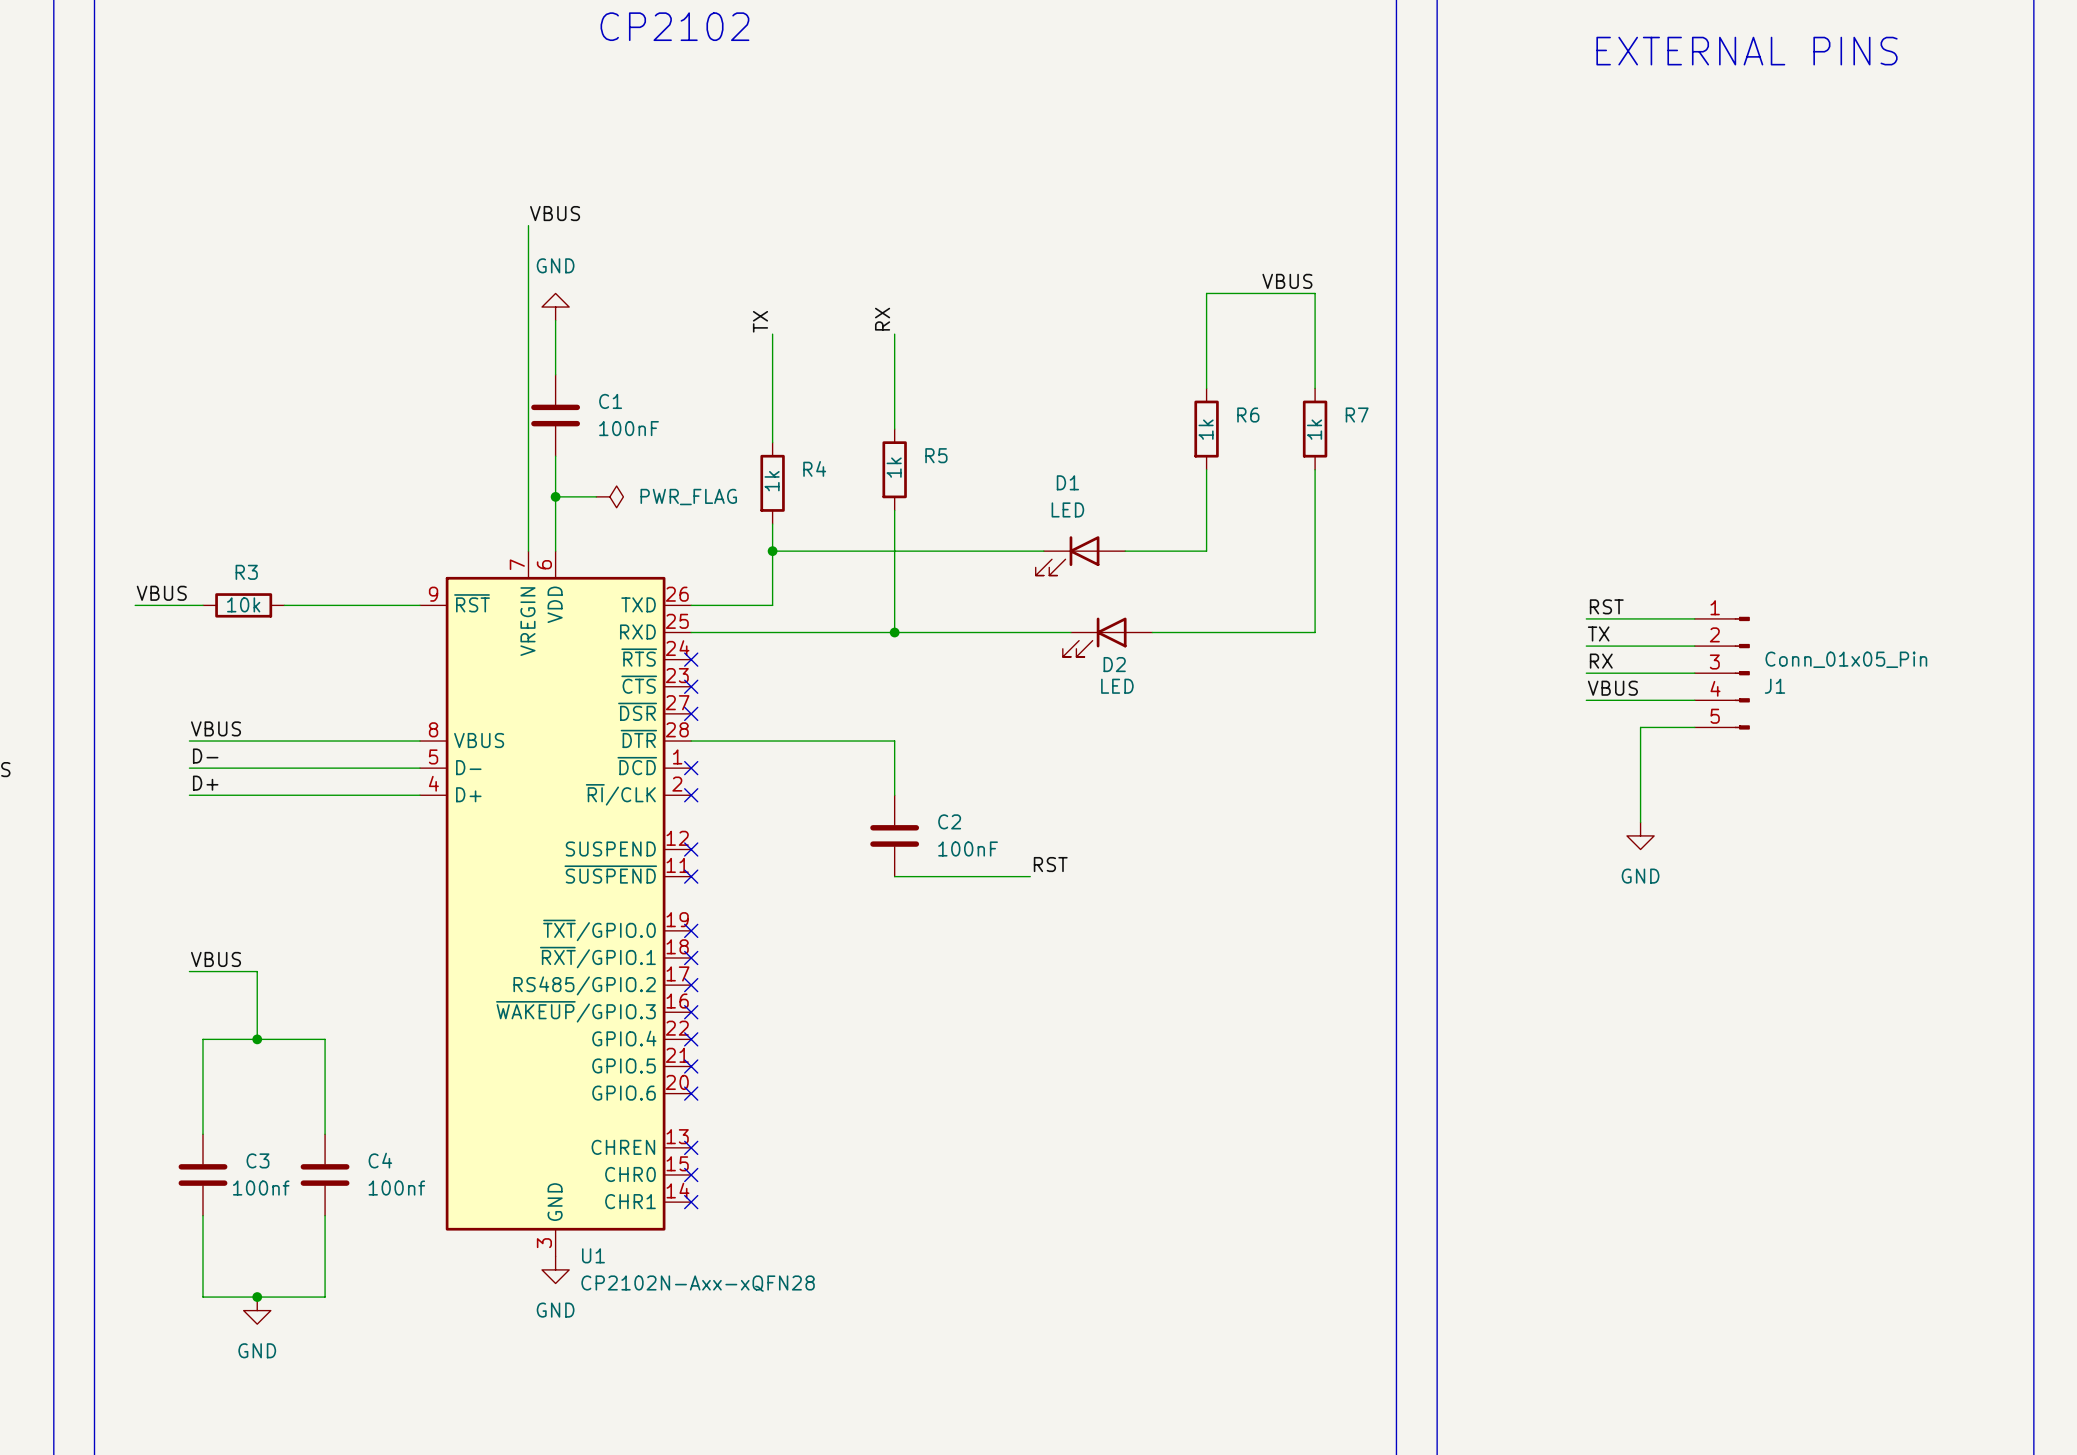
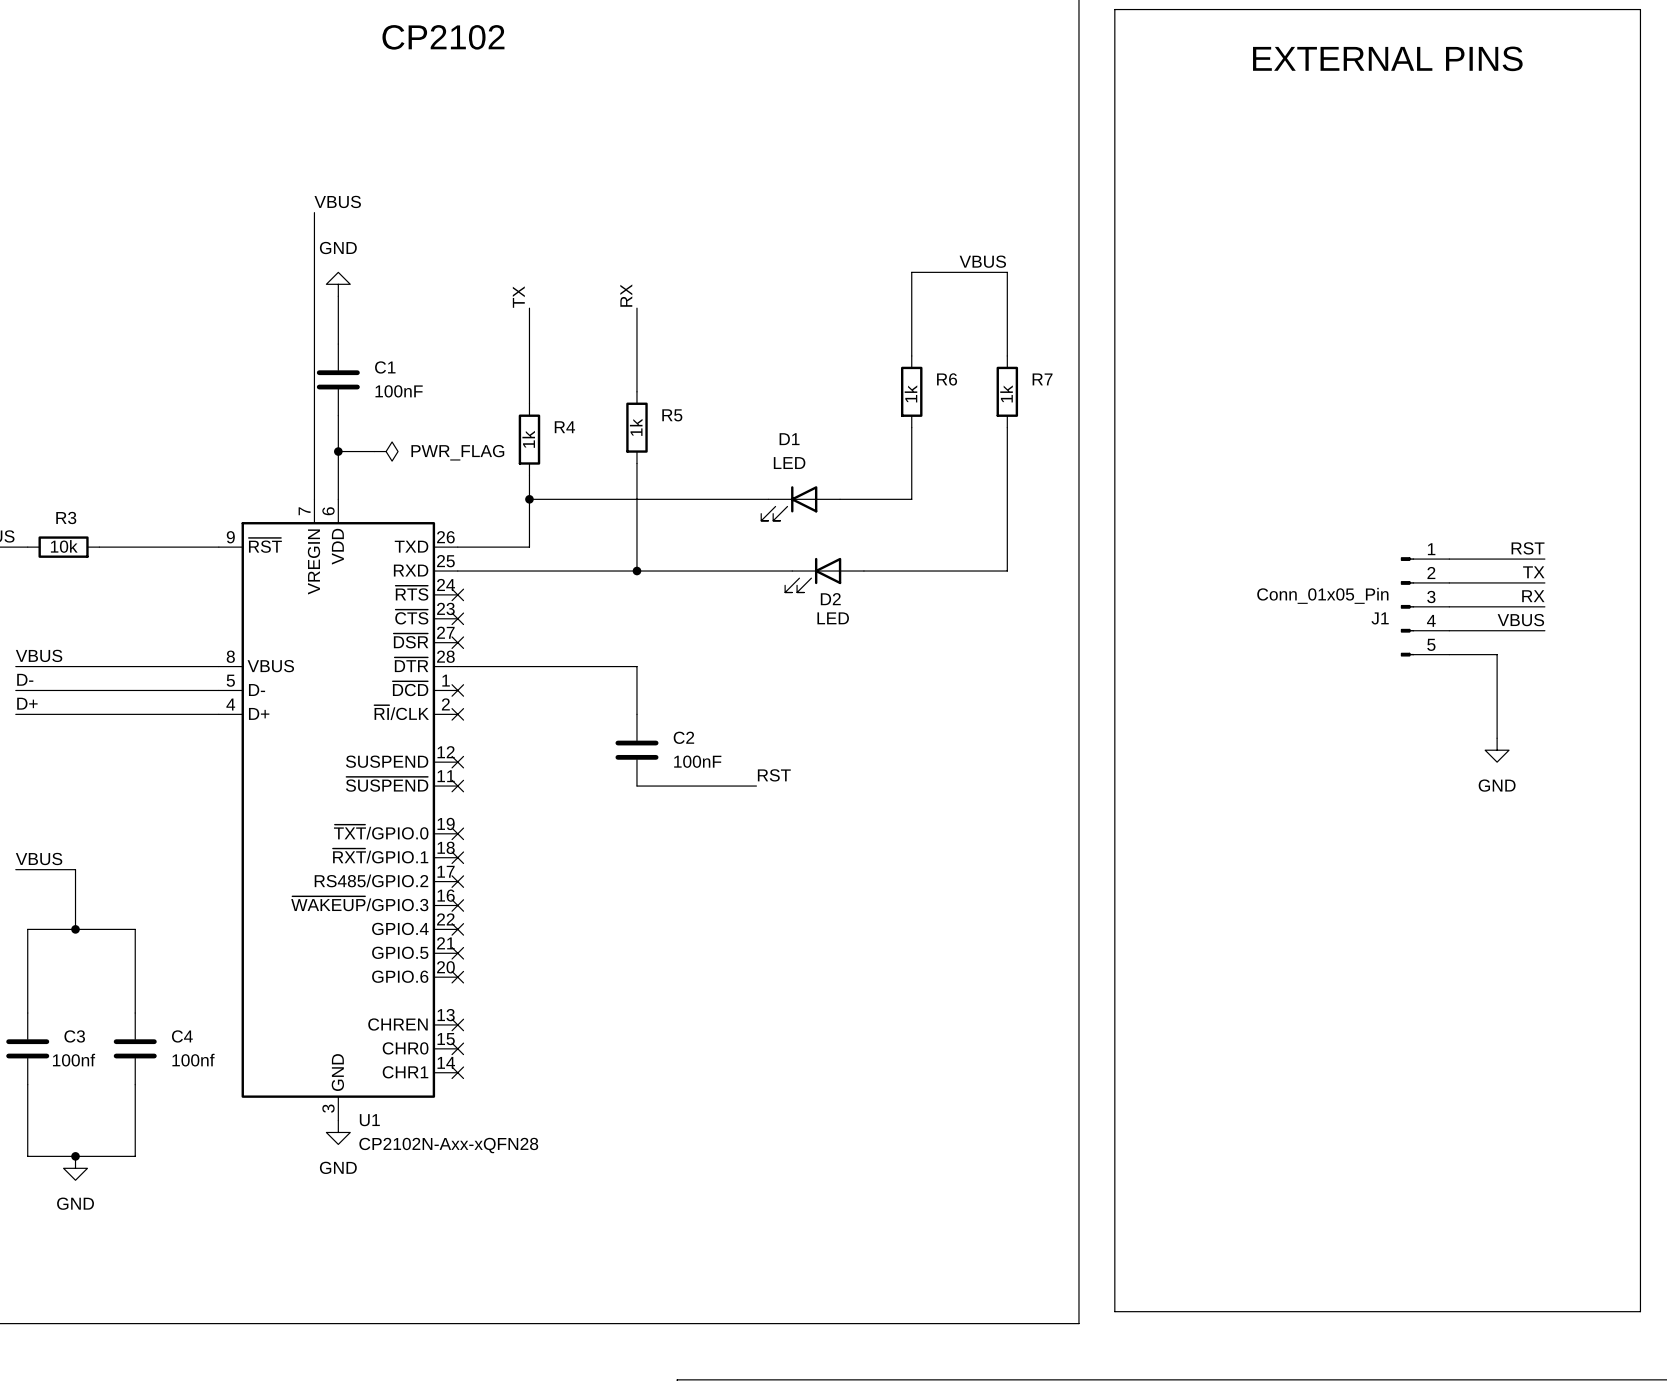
label: RST (1606, 606) -> none
label: none -> RST (1528, 548)
wire: (1586, 618) (1694, 618) -> (1449, 559) (1544, 559)
label: TX (1598, 633) -> none
label: none -> TX (1533, 572)
wire: (1586, 646) (1694, 646) -> (1449, 582) (1544, 582)
label: RX (1601, 661) -> none
label: none -> RX (1533, 596)
wire: (1586, 673) (1694, 673) -> (1449, 606) (1544, 606)
J1 flip: as is (1742, 673) -> left-right (1407, 606)
label: VBUS (1612, 688) -> none
label: none -> VBUS (1520, 620)
wire: (1586, 700) (1694, 700) -> (1449, 630) (1544, 630)
wire: (1694, 727) (1640, 727) (1640, 822) -> none
wire: none -> (1449, 654) (1497, 654) (1497, 738)
power symbol position: GND (1640, 835) -> GND (1497, 750)

